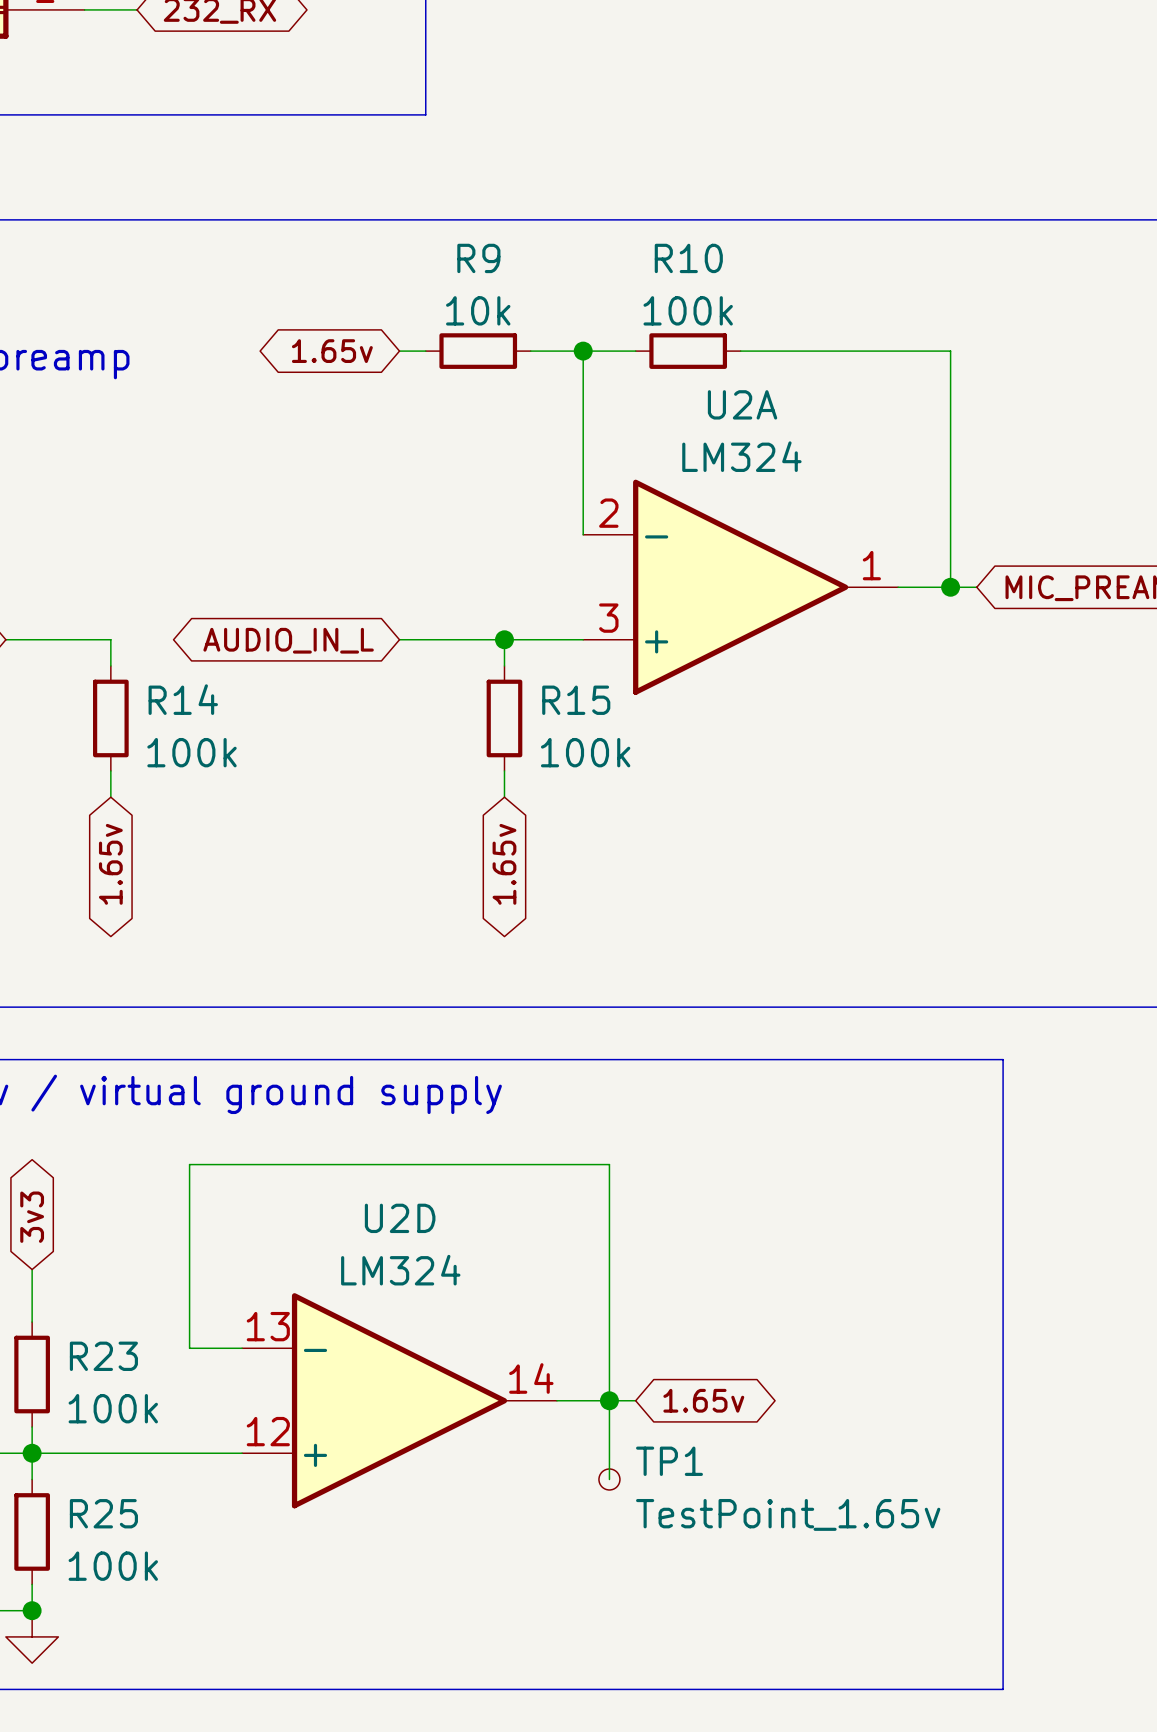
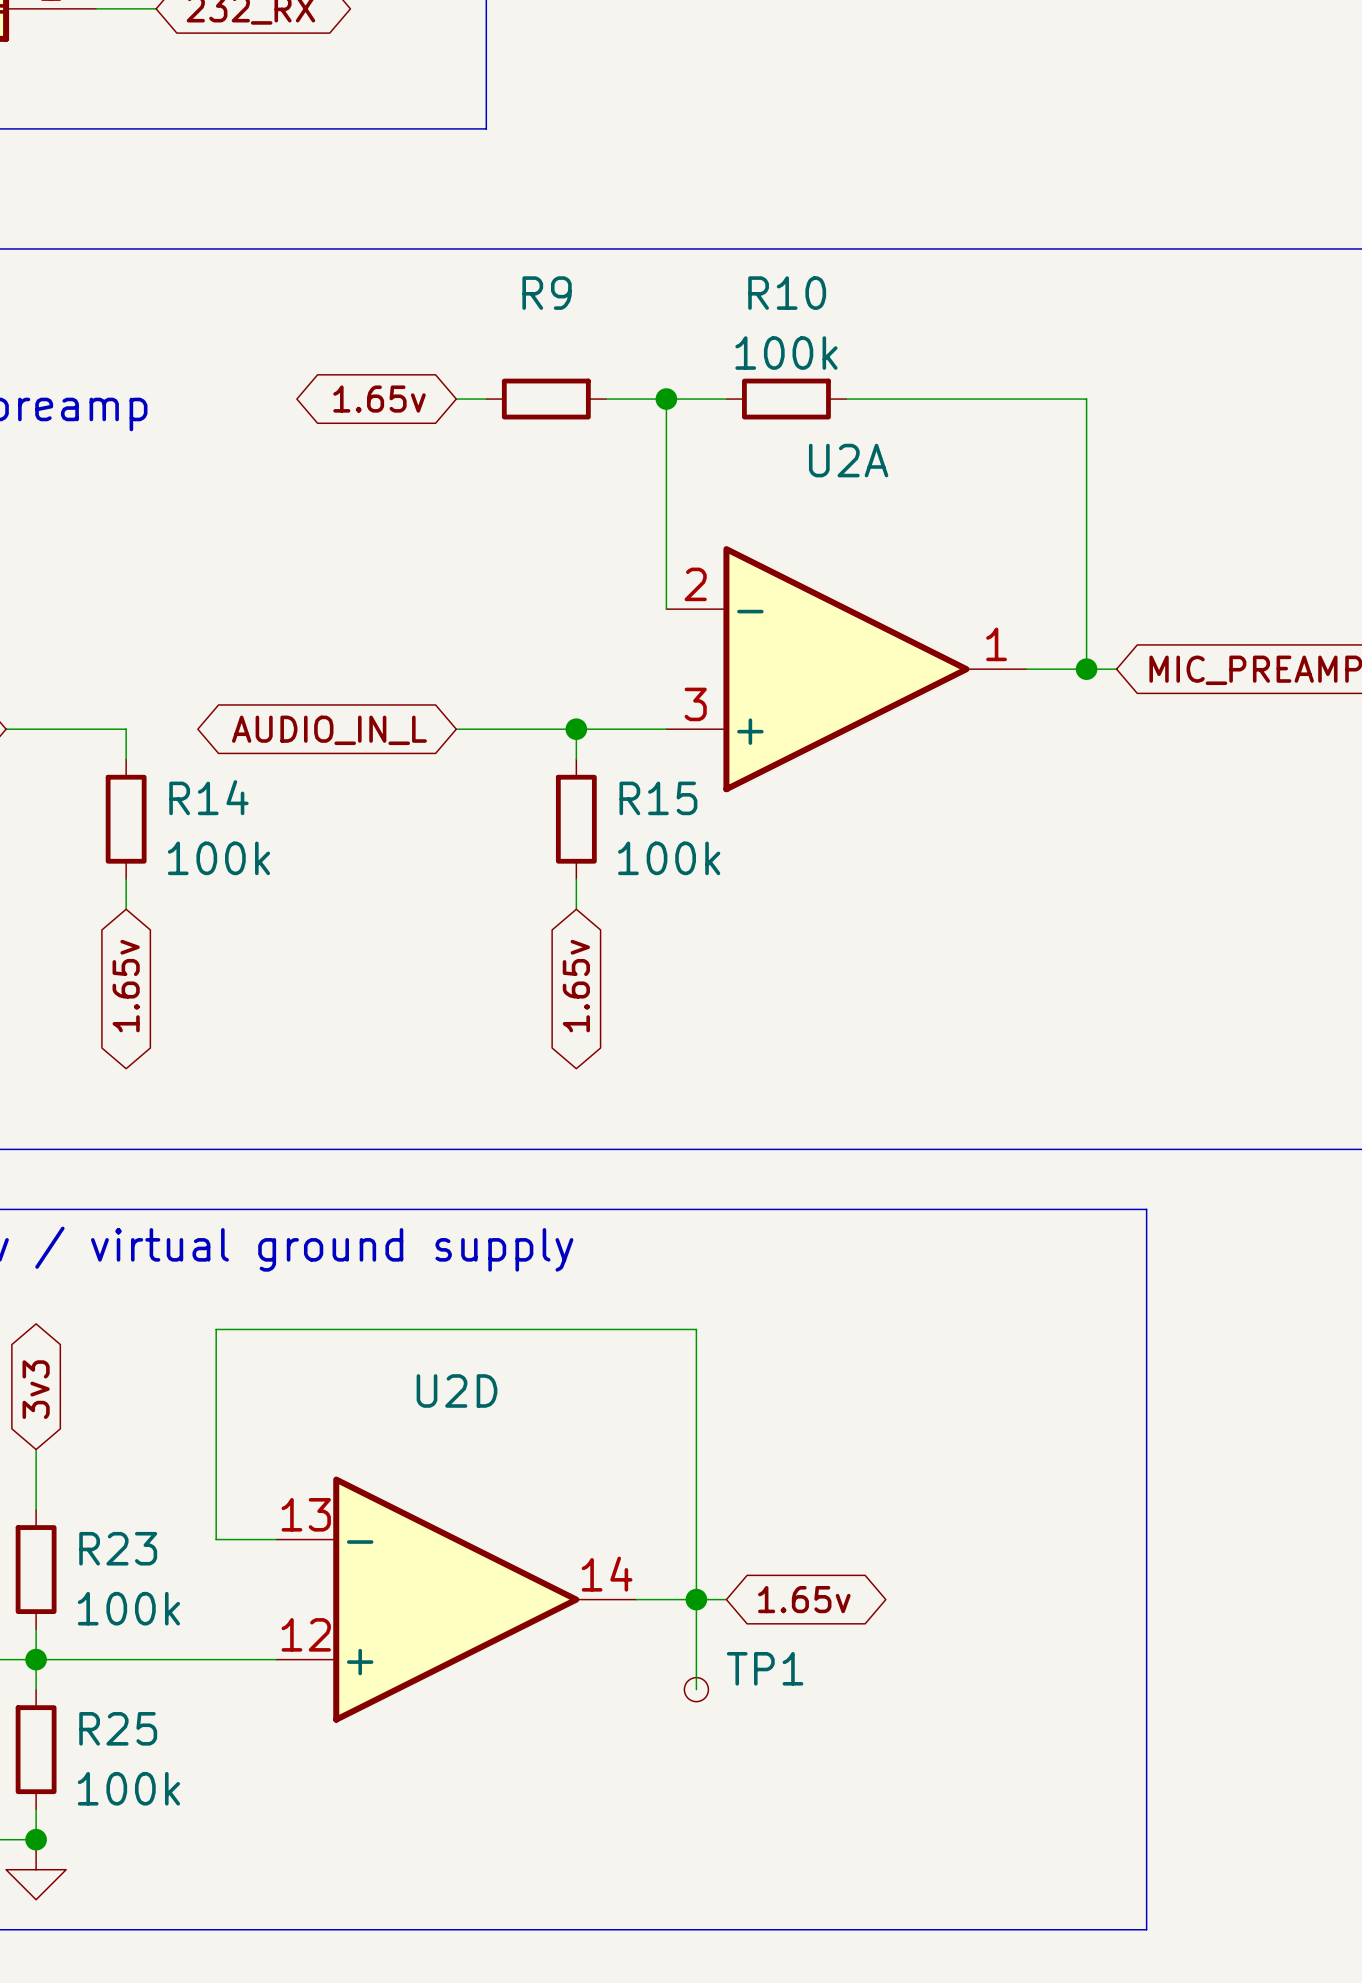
R9 value: 10k (478, 310) -> none
U2A value: LM324 (741, 456) -> none
U2D value: LM324 (400, 1270) -> none
TP1 value: TestPoint_1.65v (788, 1514) -> none

